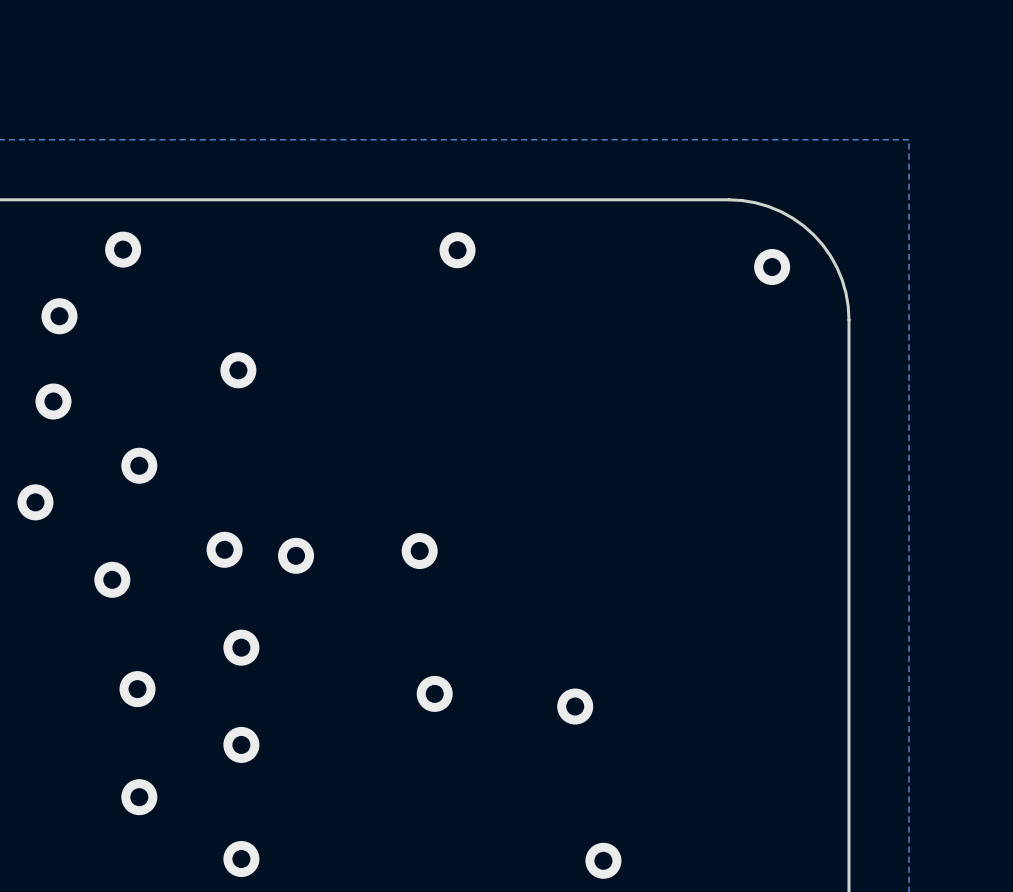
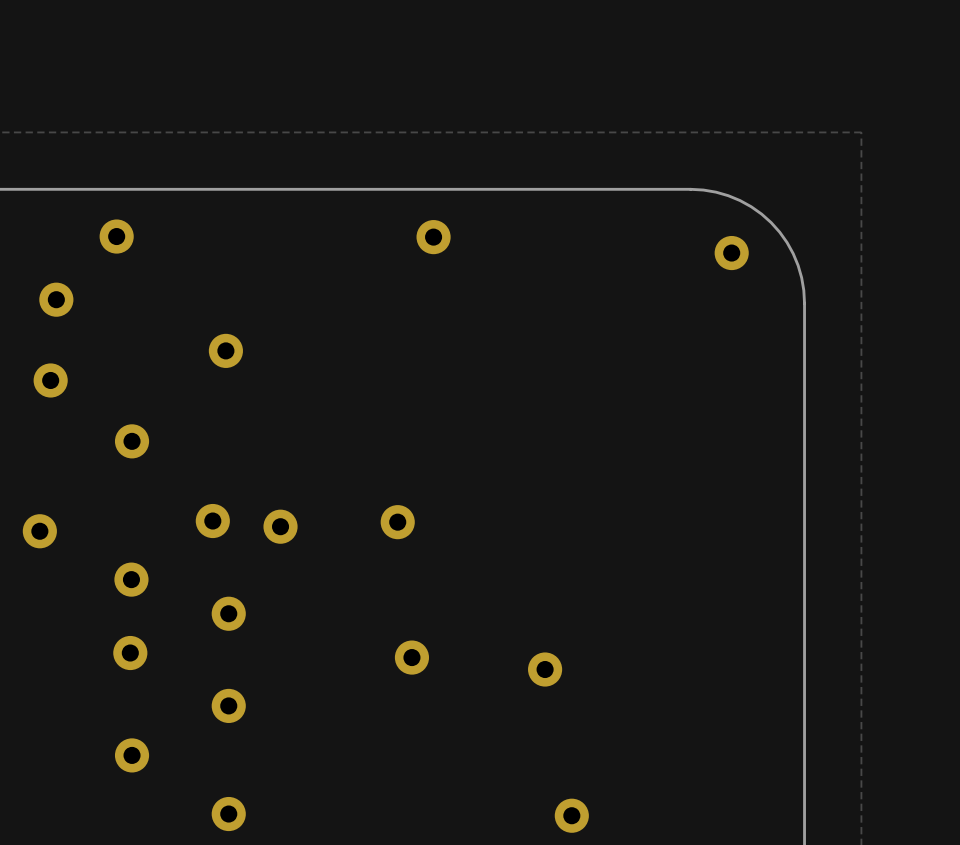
via: (35, 502) -> none
via: none -> (39, 531)
via position: (112, 579) -> (131, 579)

